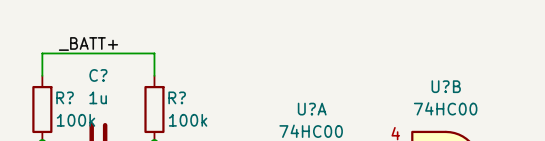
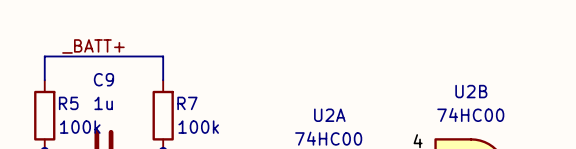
C? name: C? (98, 75) -> C9 (103, 79)
U?B name: U?B (446, 86) -> U2B (471, 91)
R? name: R? (65, 97) -> R5 (68, 103)
R? name: R? (177, 97) -> R7 (187, 103)
U?A name: U?A (312, 109) -> U2A (329, 115)

